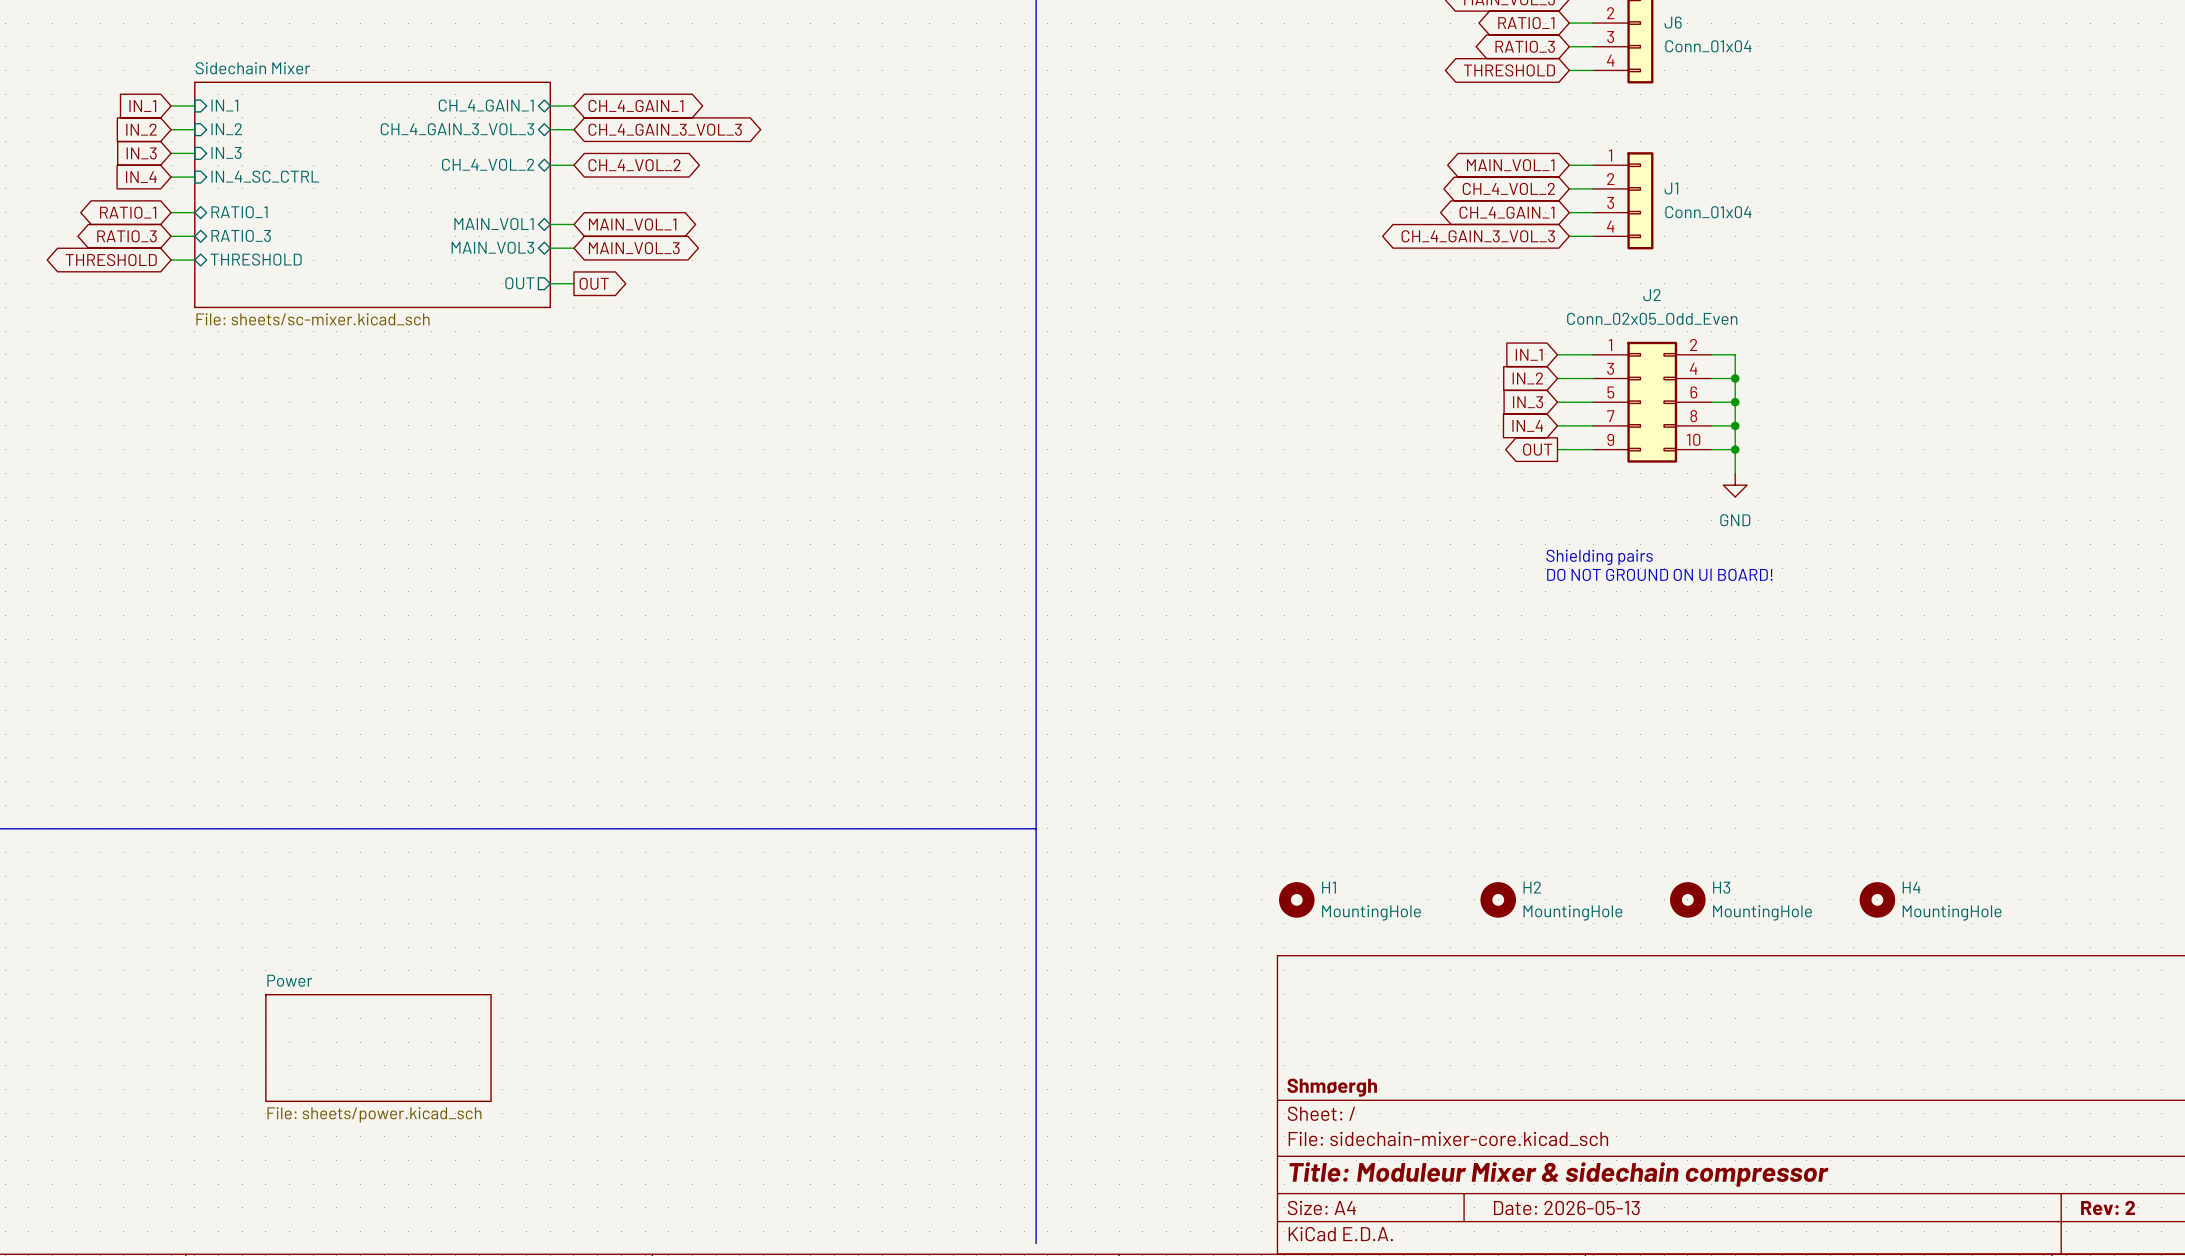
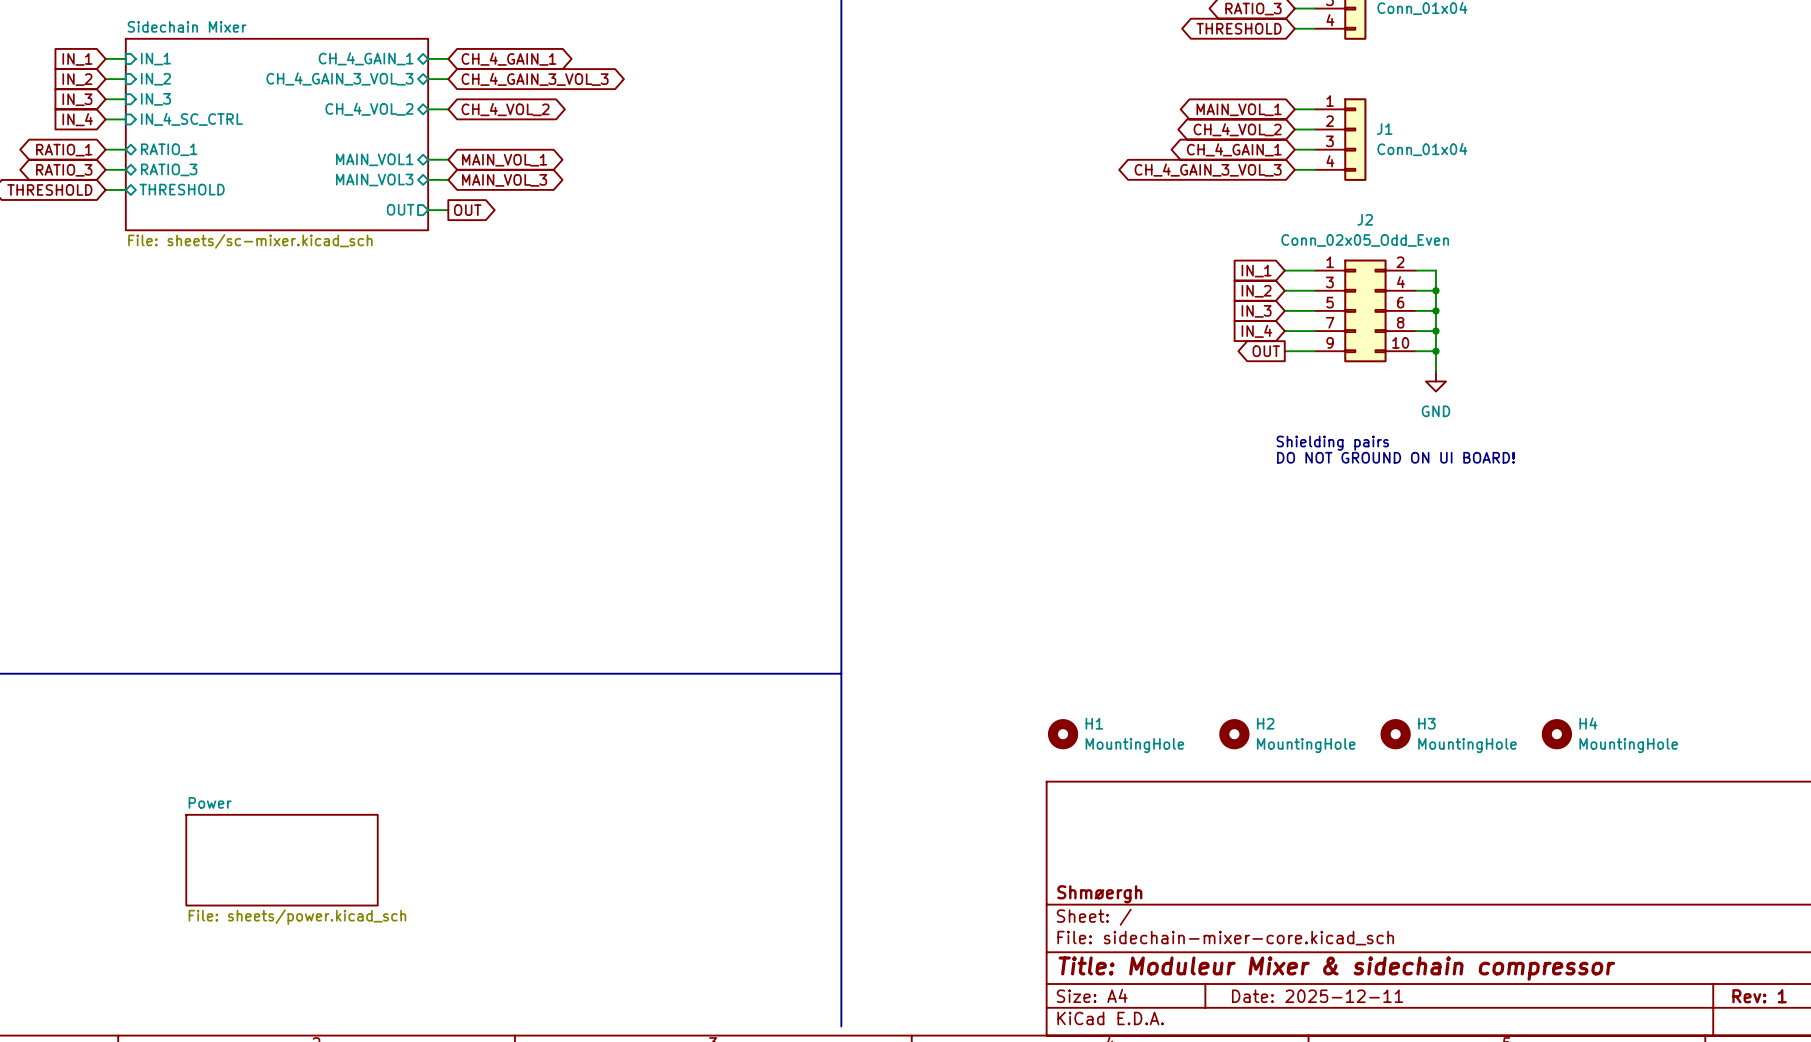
title block: Date: 2026-05-13 (1566, 1208) -> Date: 2025-12-11 (1317, 996)
title block: Rev: 2 (2108, 1208) -> Rev: 1 (1759, 996)

